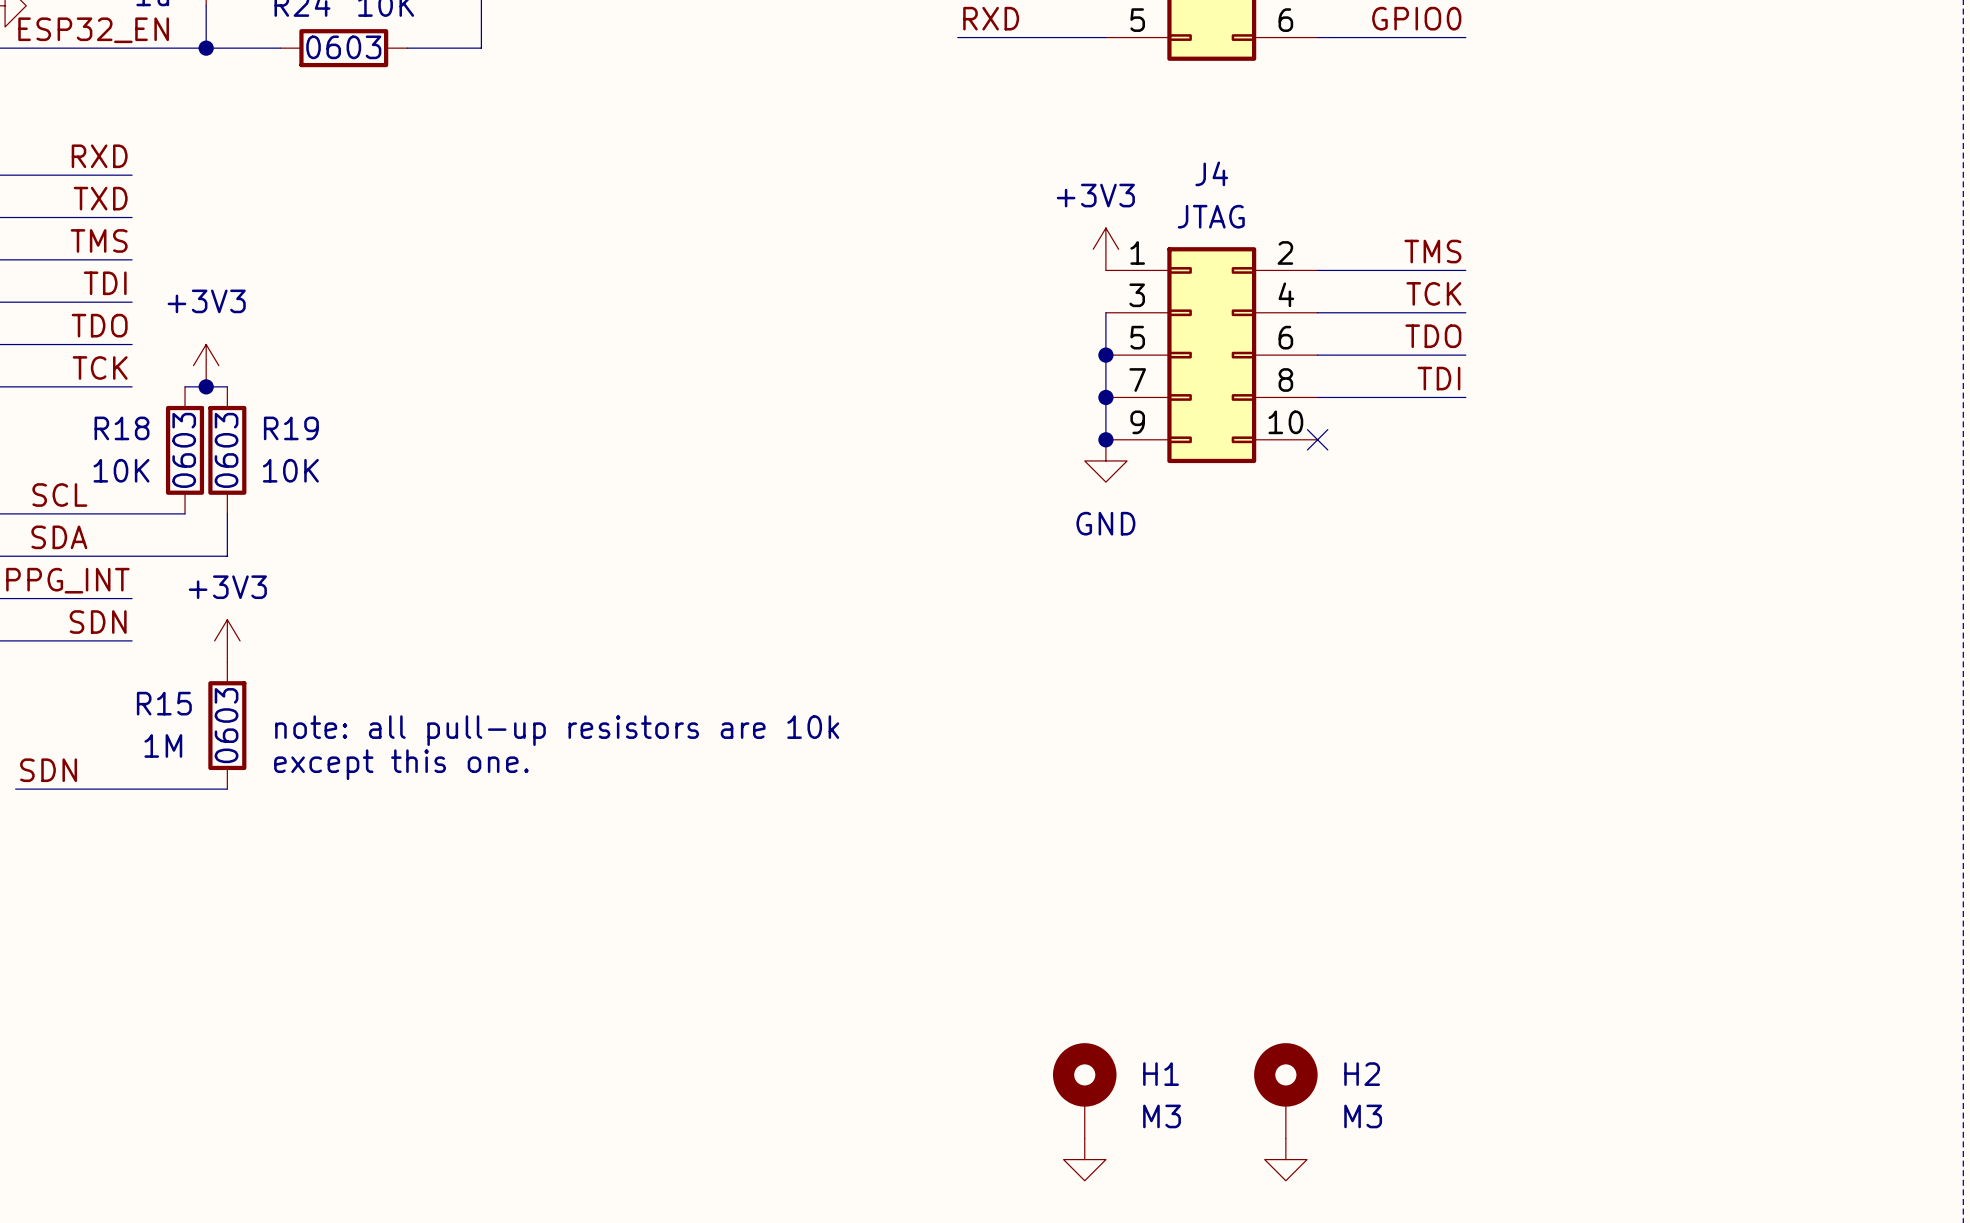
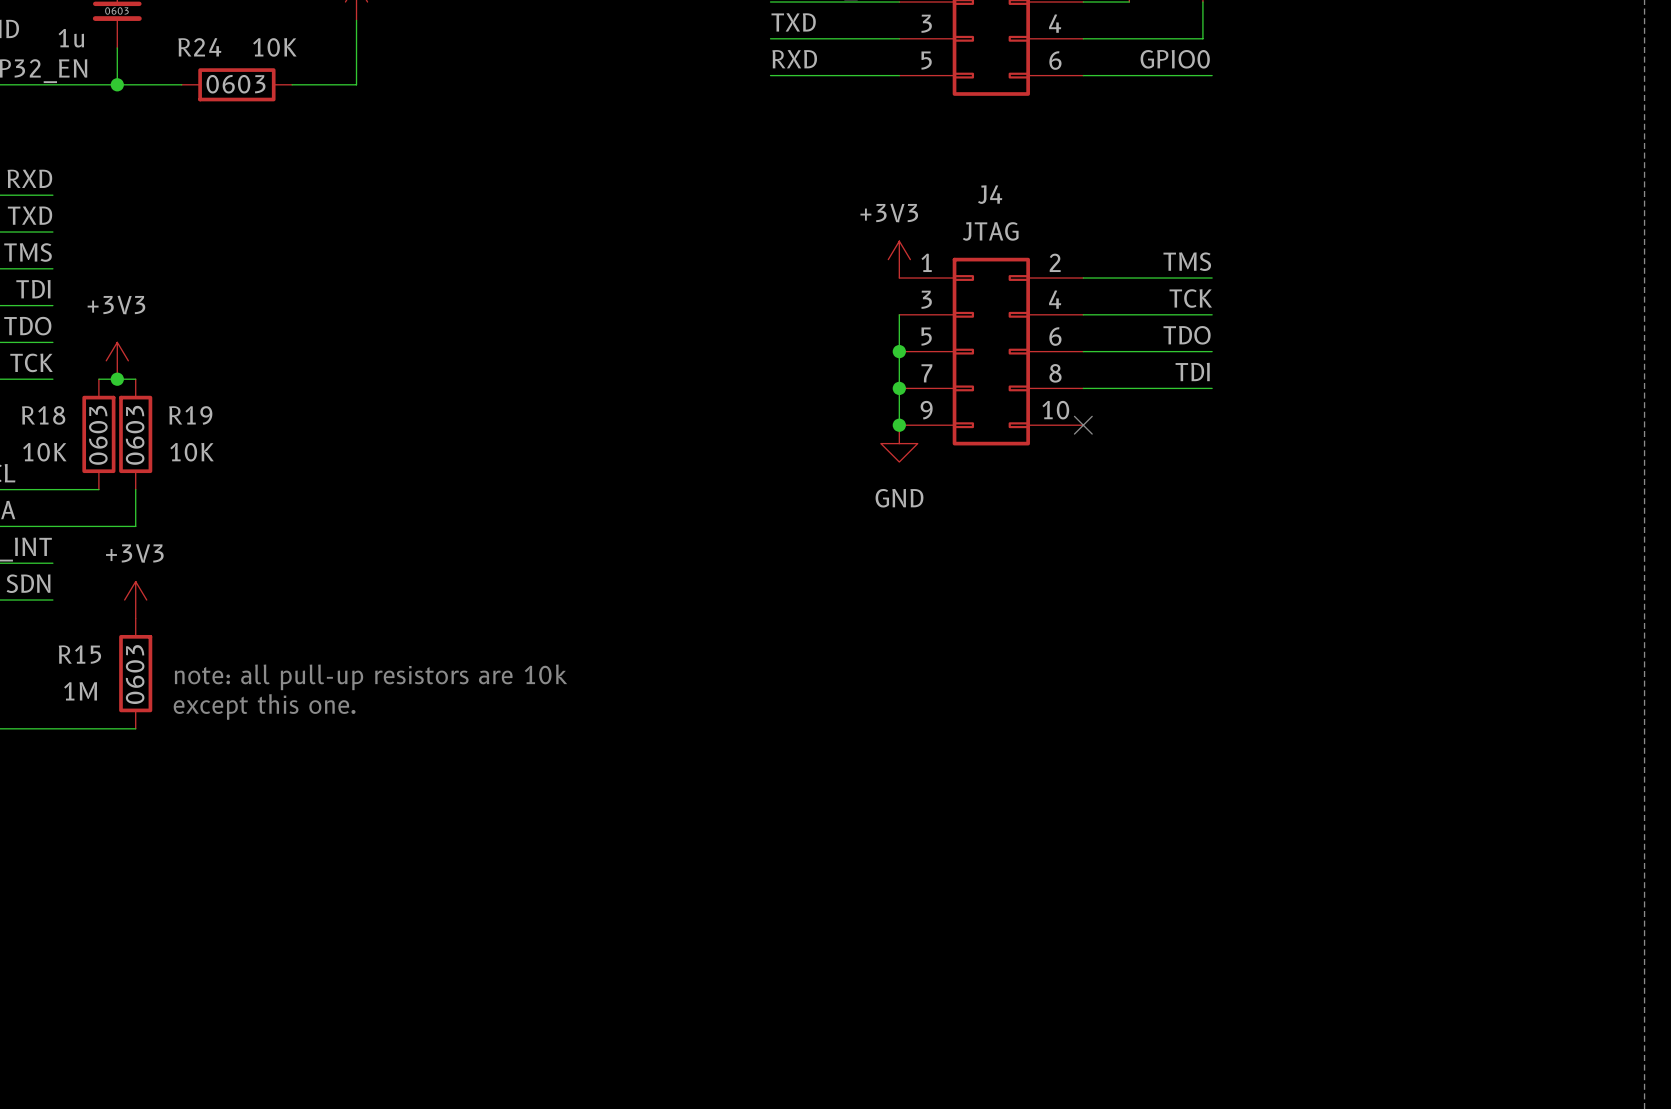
H1: M3 (1084, 1090) -> none
H2: M3 (1285, 1090) -> none
power symbol: (1084, 1159) -> none
power symbol: (1285, 1159) -> none

